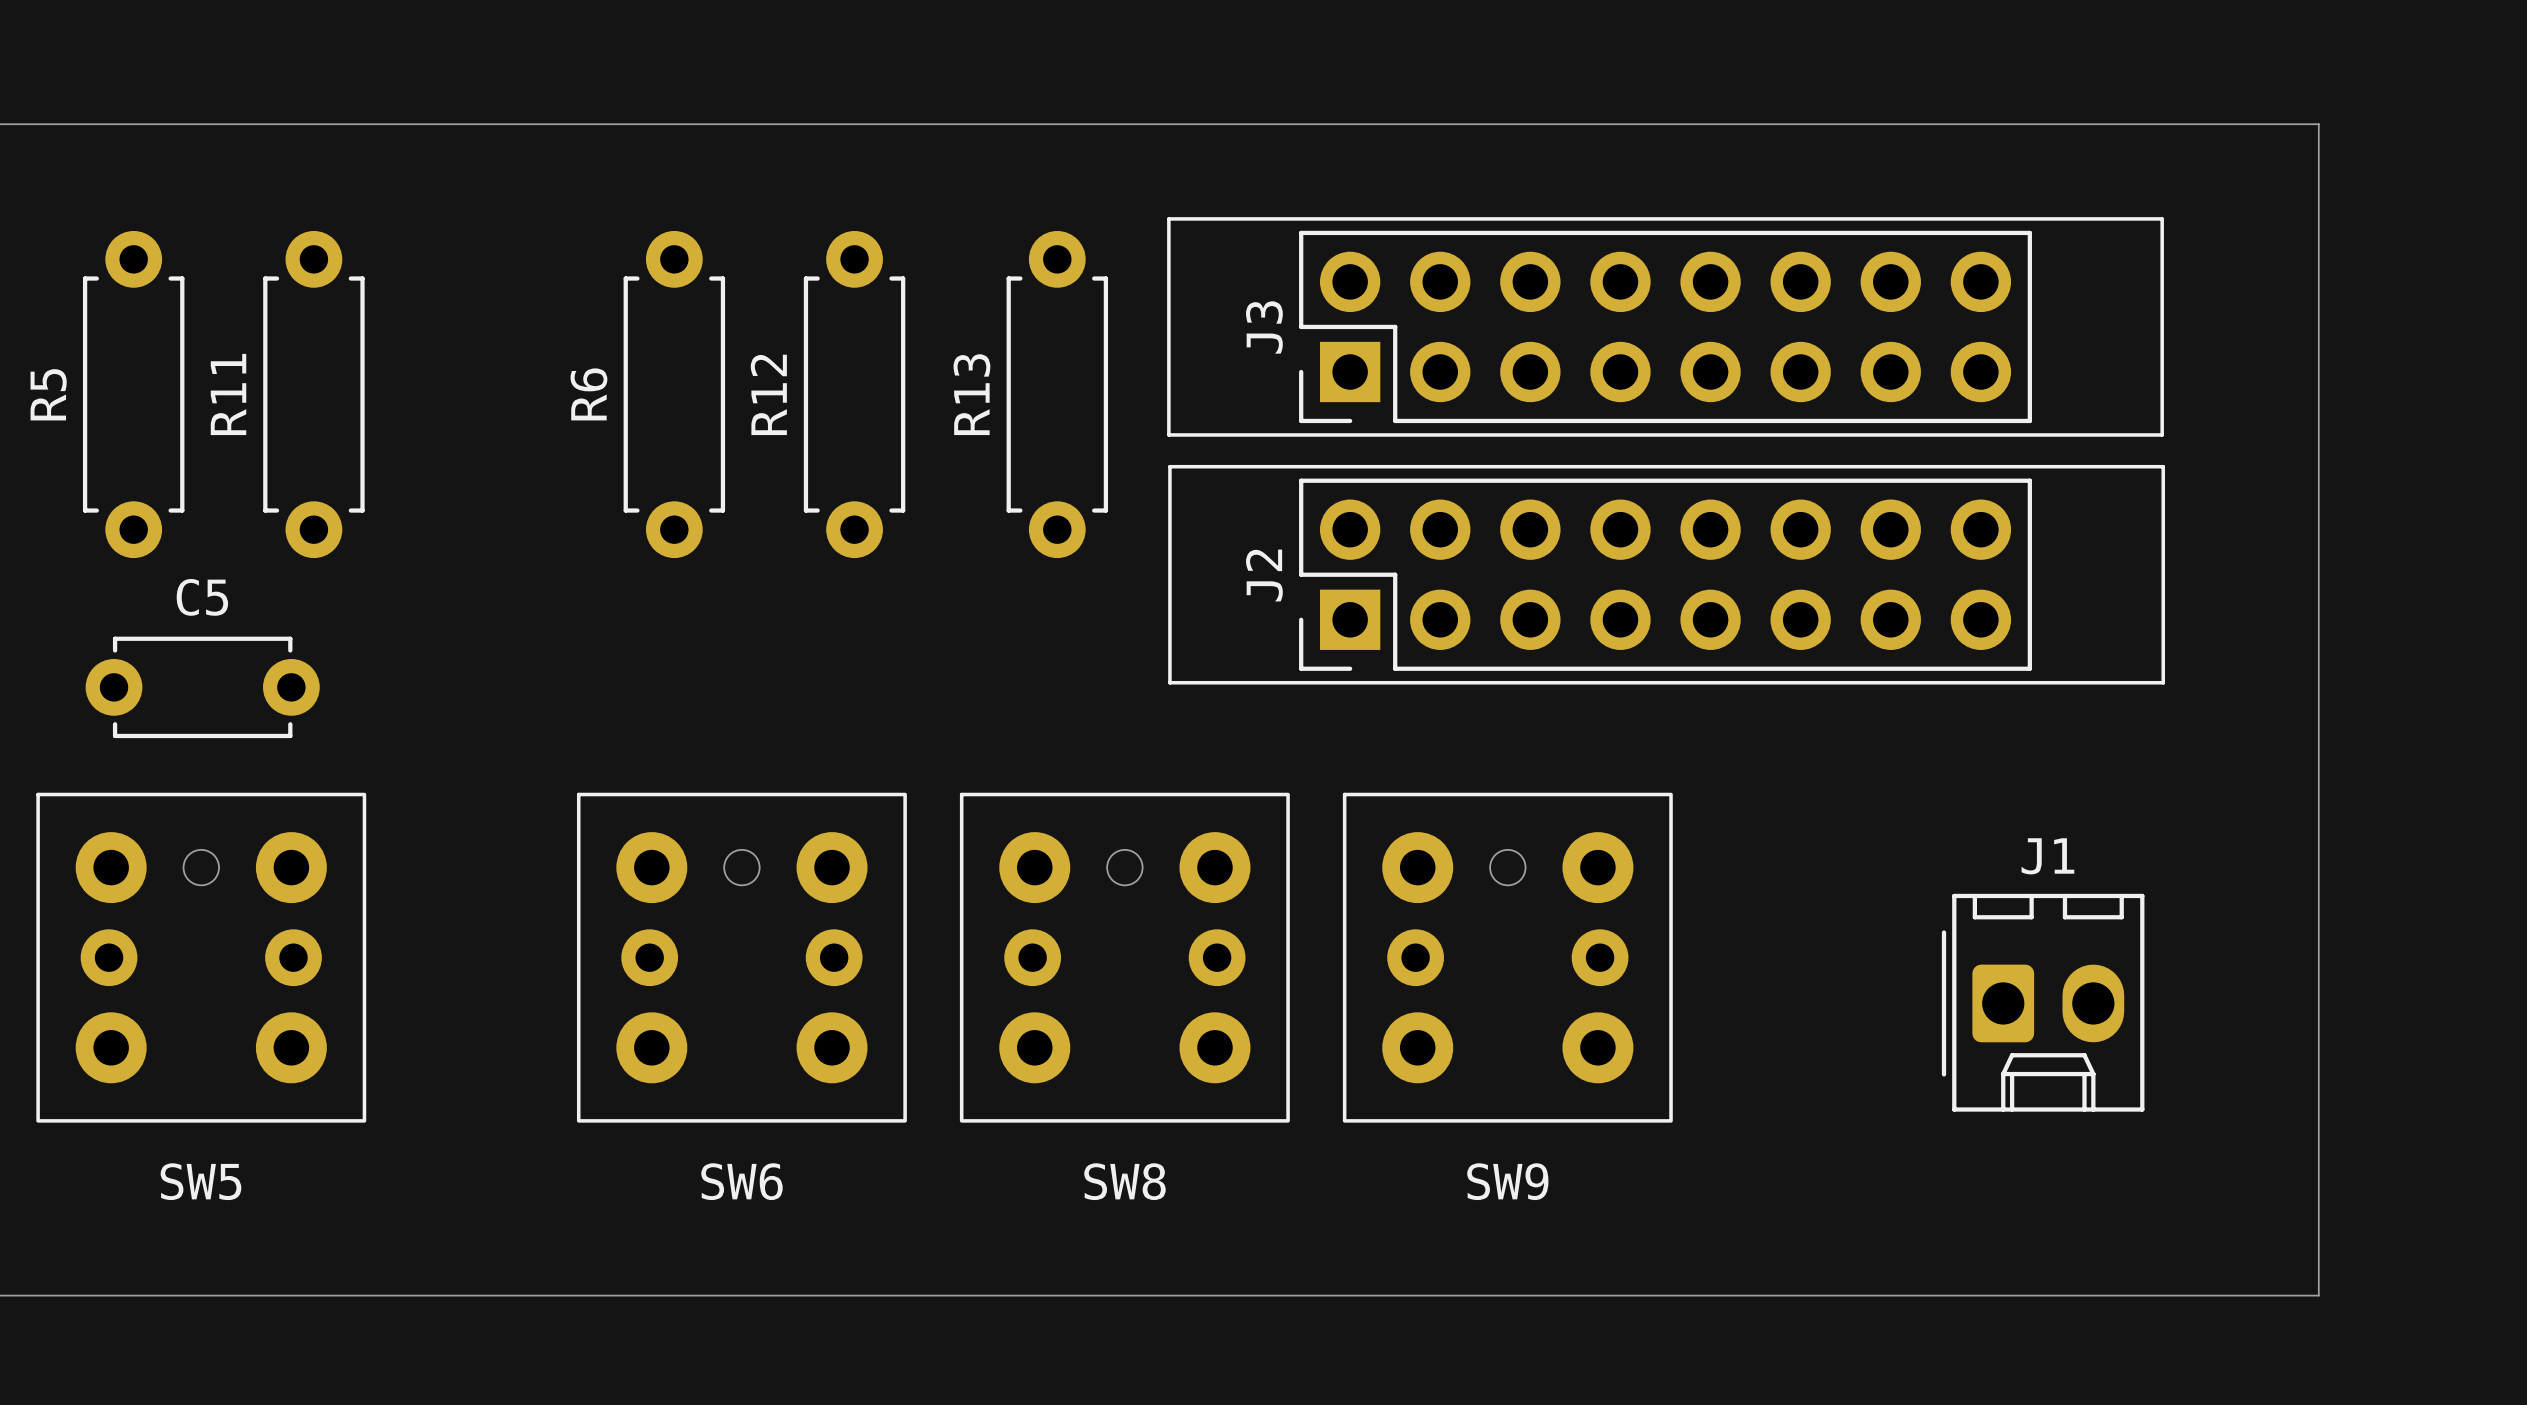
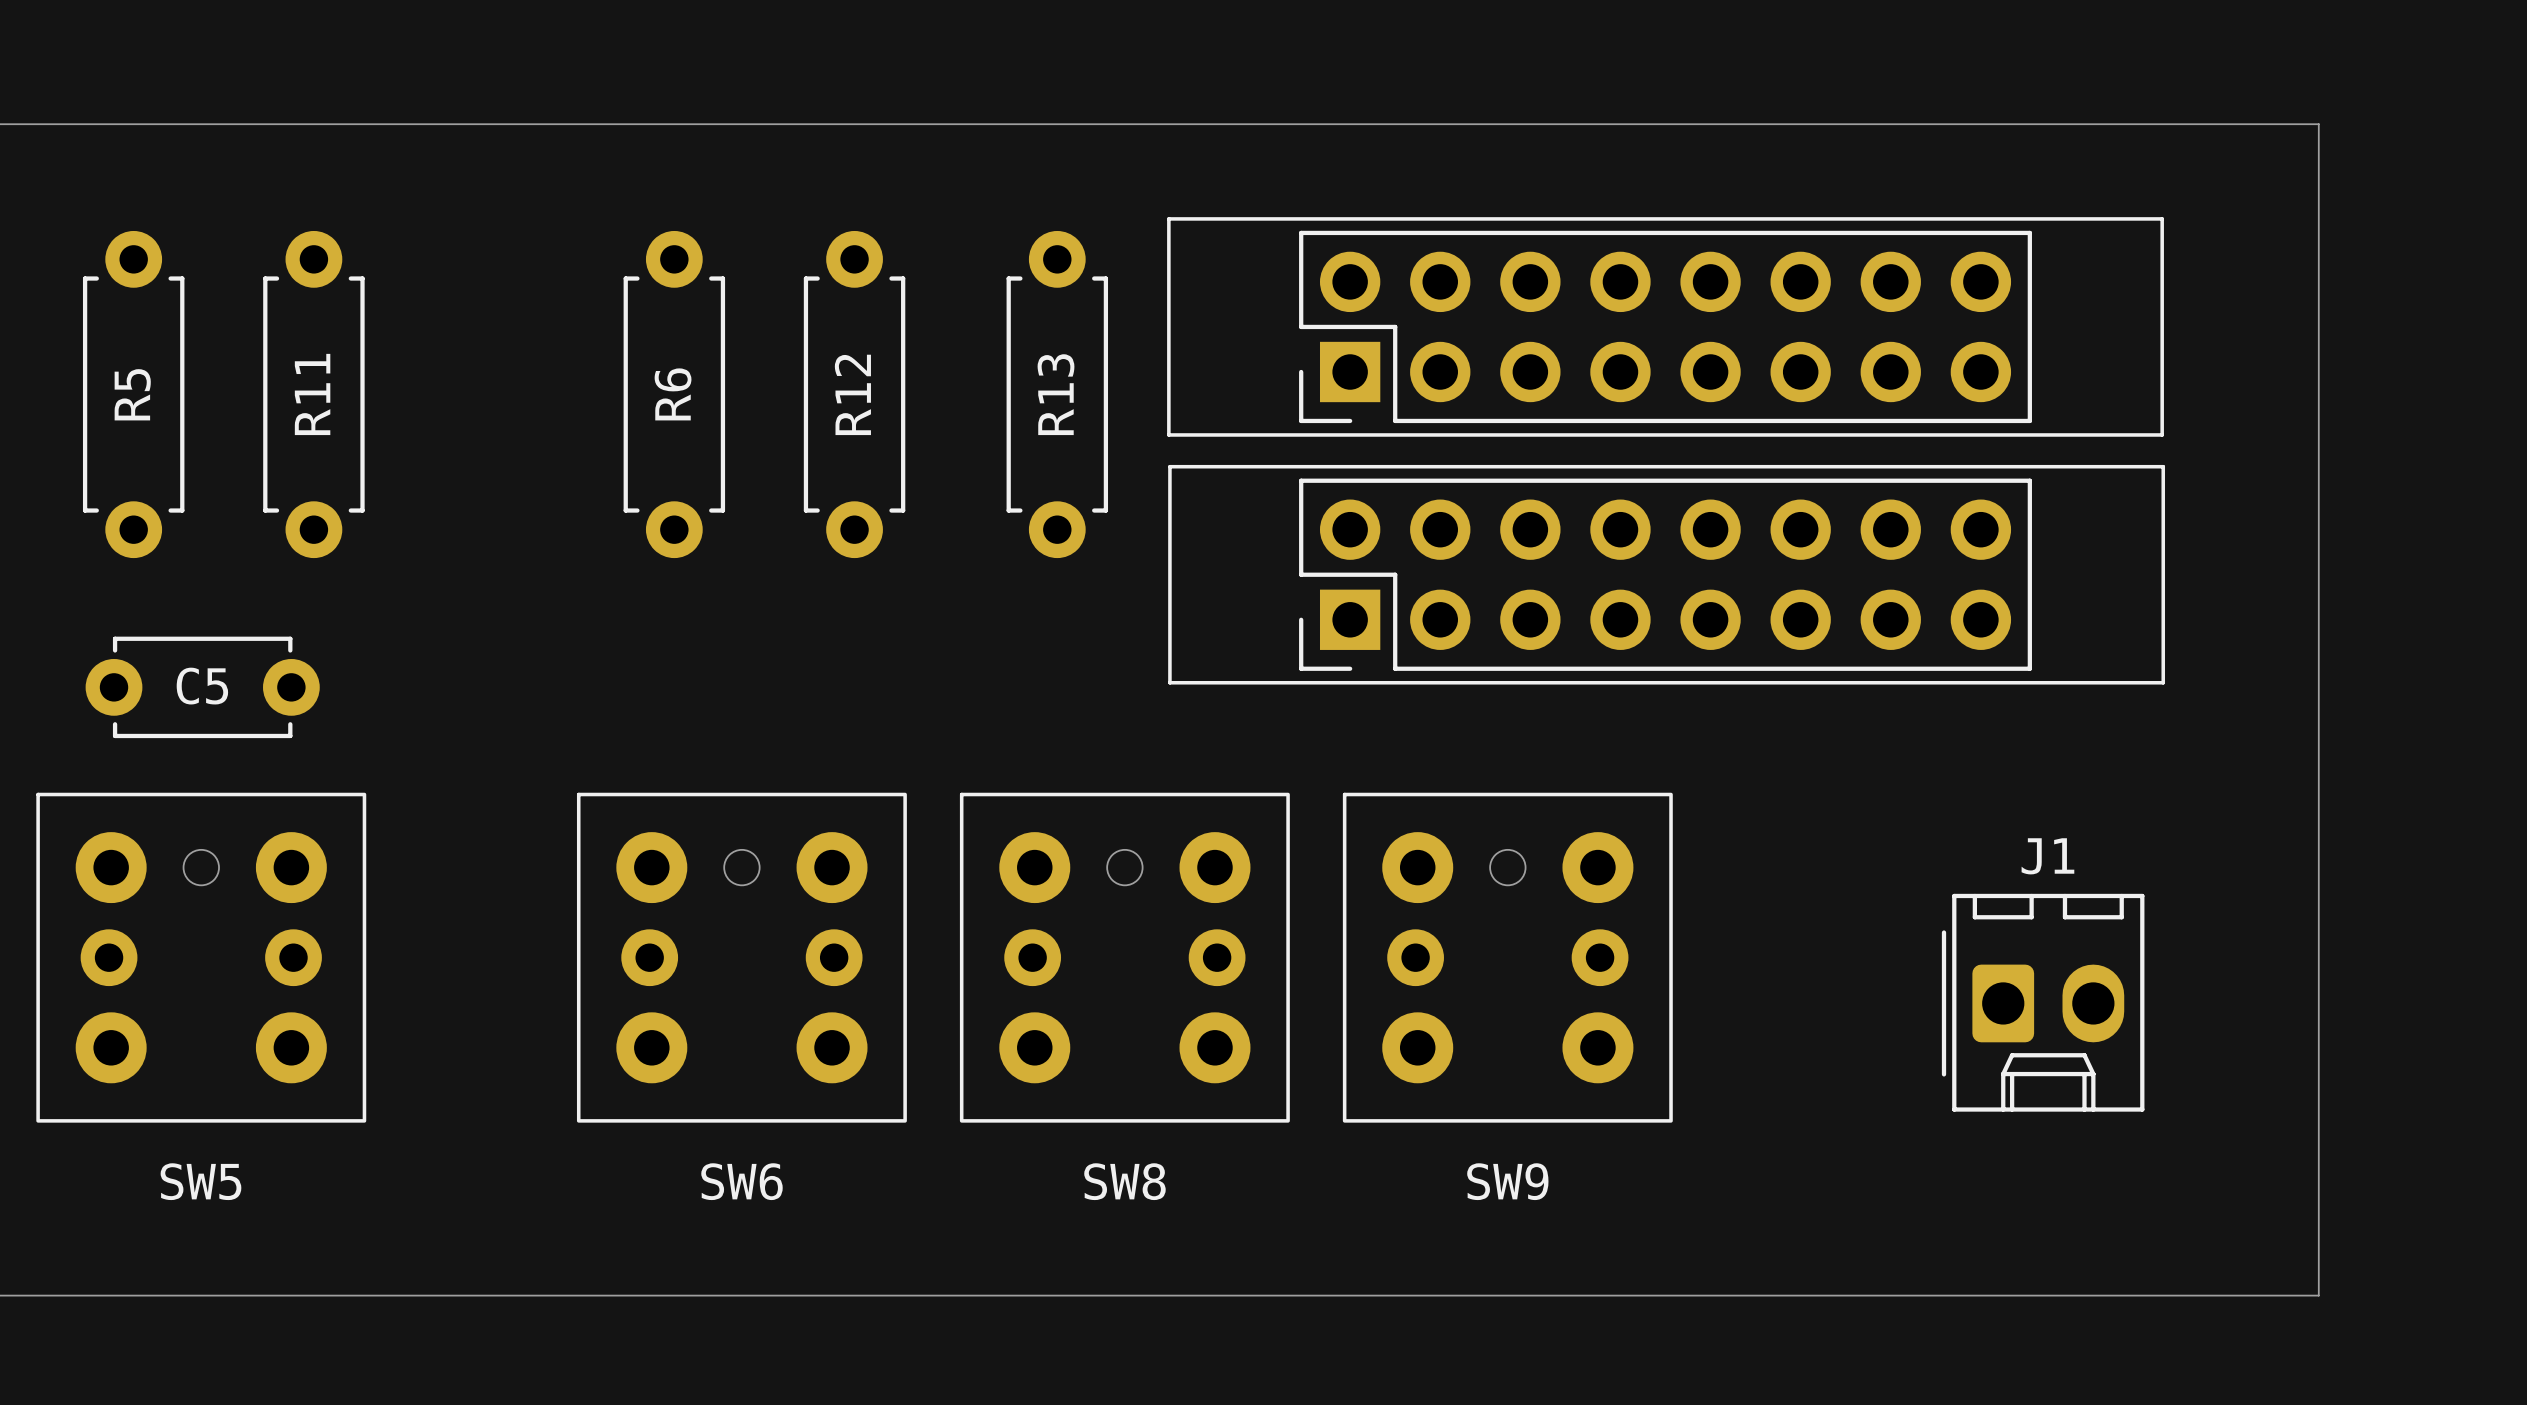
J3 name: J3 (1264, 327) -> none
R5 name position: R5 (48, 394) -> R5 (132, 394)
R11 name position: R11 (228, 394) -> R11 (312, 394)
R6 name position: R6 (588, 394) -> R6 (673, 394)
R12 name position: R12 (768, 394) -> R12 (852, 394)
R13 name position: R13 (971, 394) -> R13 (1055, 394)
J2 name: J2 (1264, 575) -> none
C5 name position: C5 (202, 597) -> C5 (202, 686)

